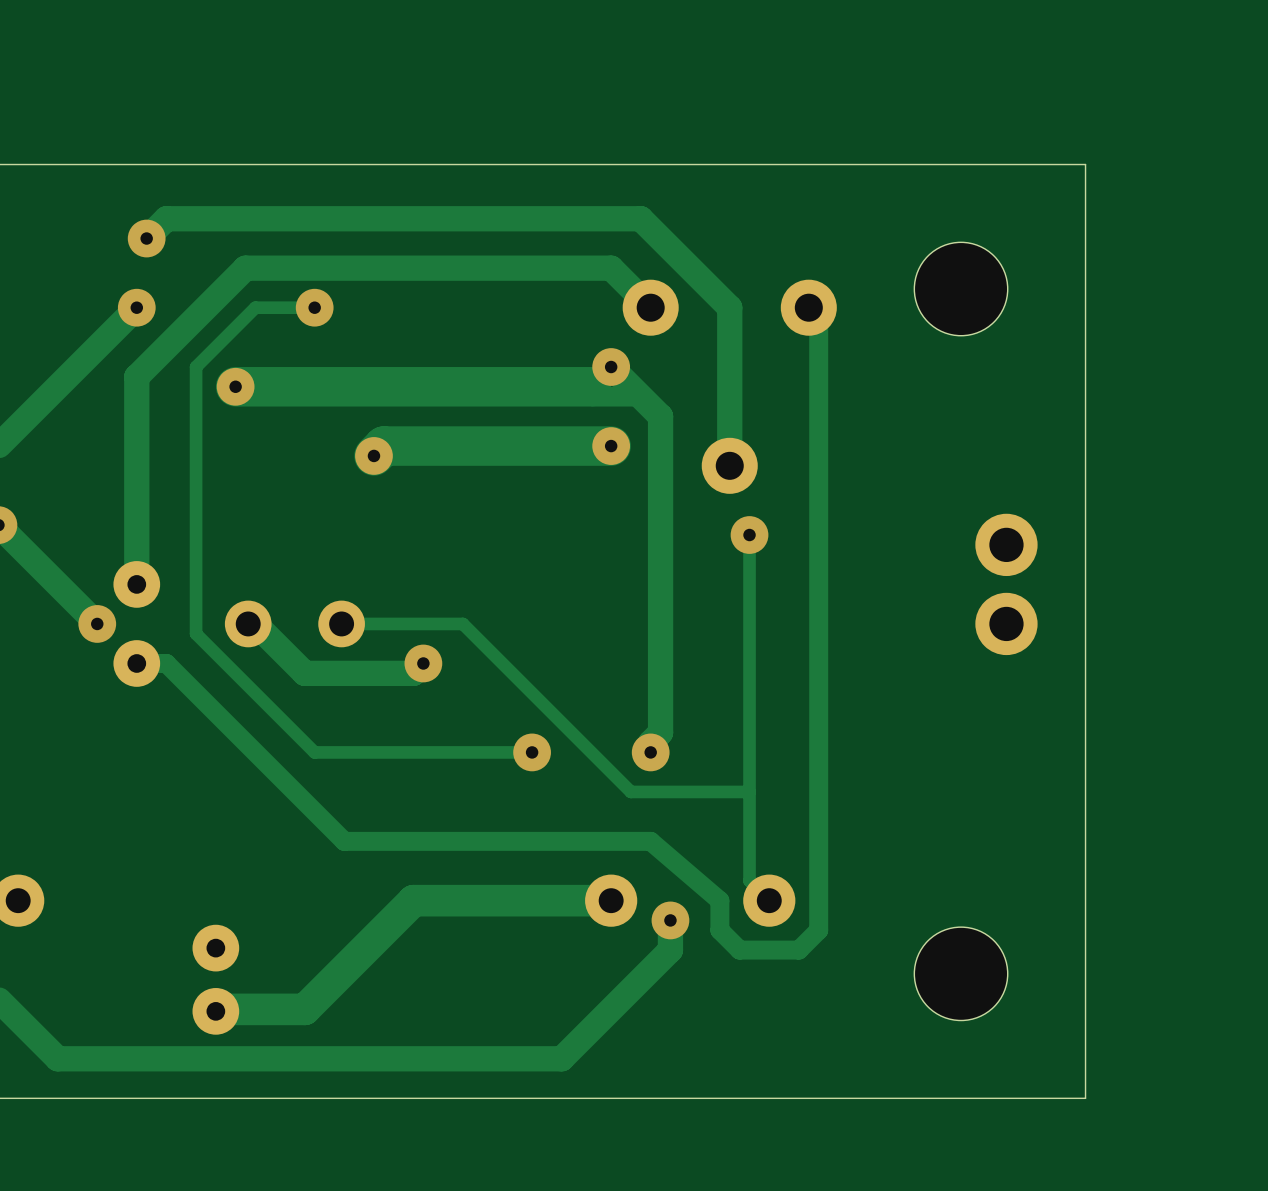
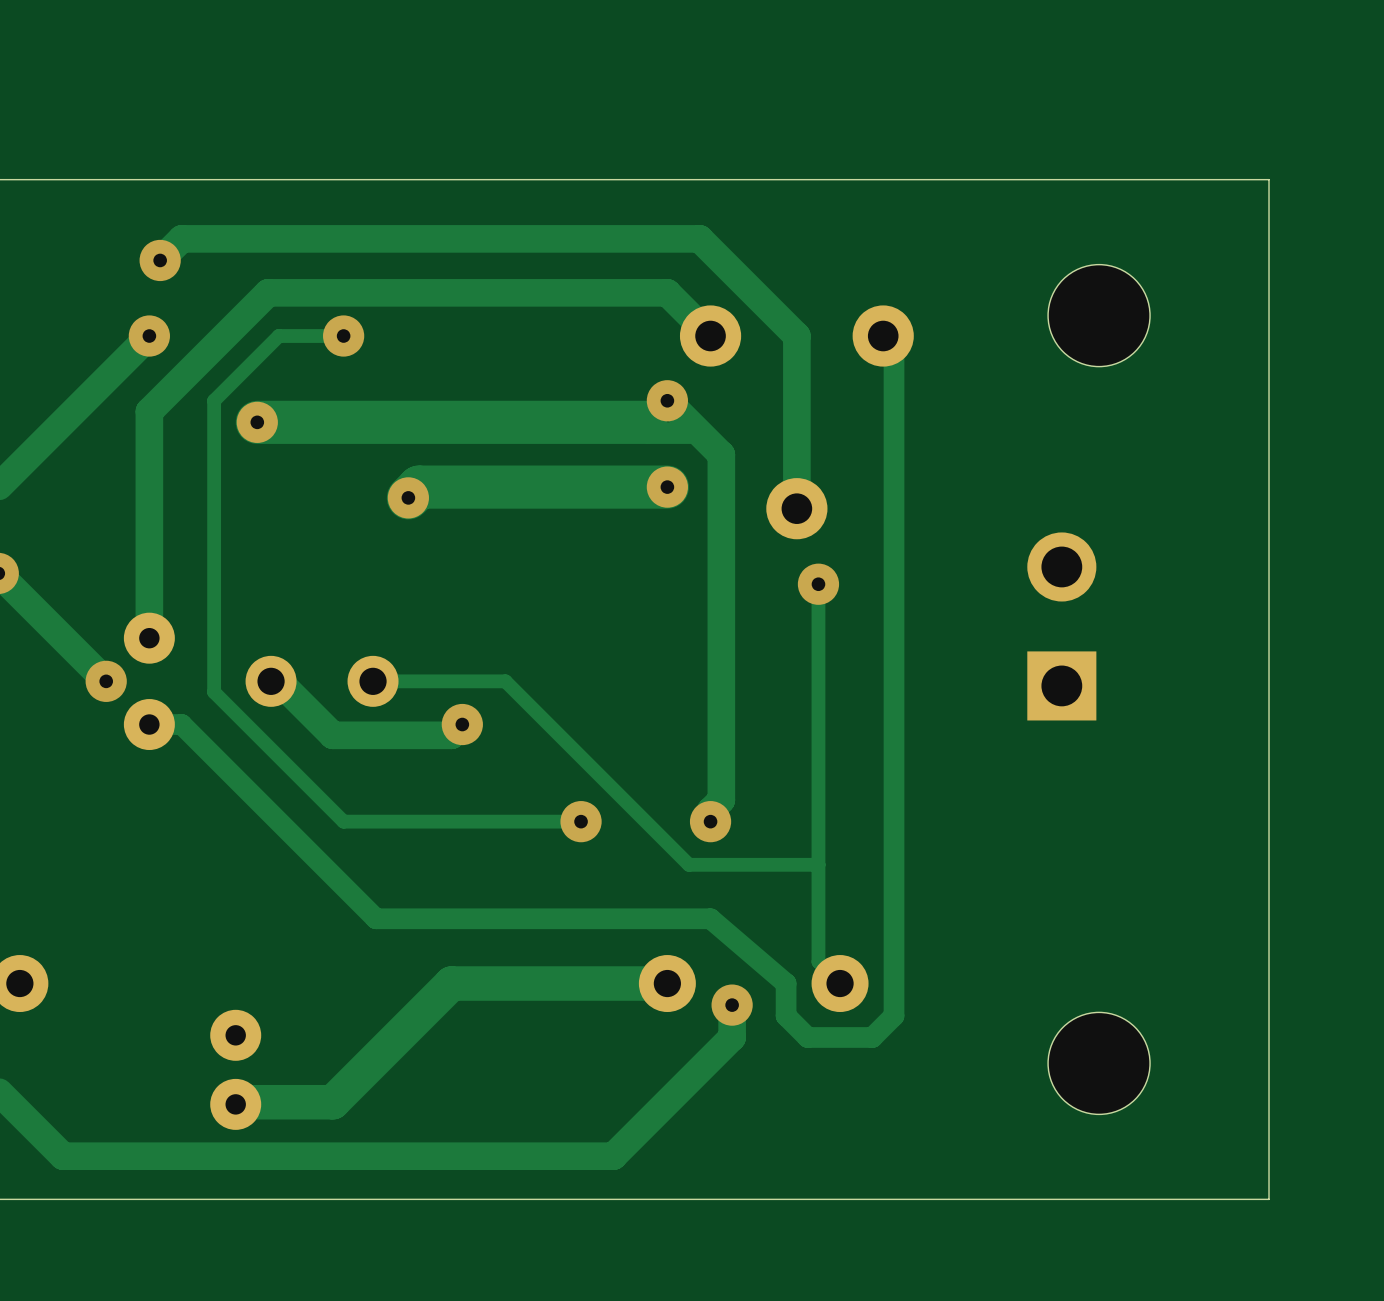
board edge: (1085, 164) (1085, 1098) -> (1185, 179) (1269, 179) (1269, 1199) (1185, 1199)
part position: (961, 289) -> (1099, 315)
part: none -> (1061, 626)
part: (1006, 584) -> none
part position: (961, 973) -> (1099, 1063)

